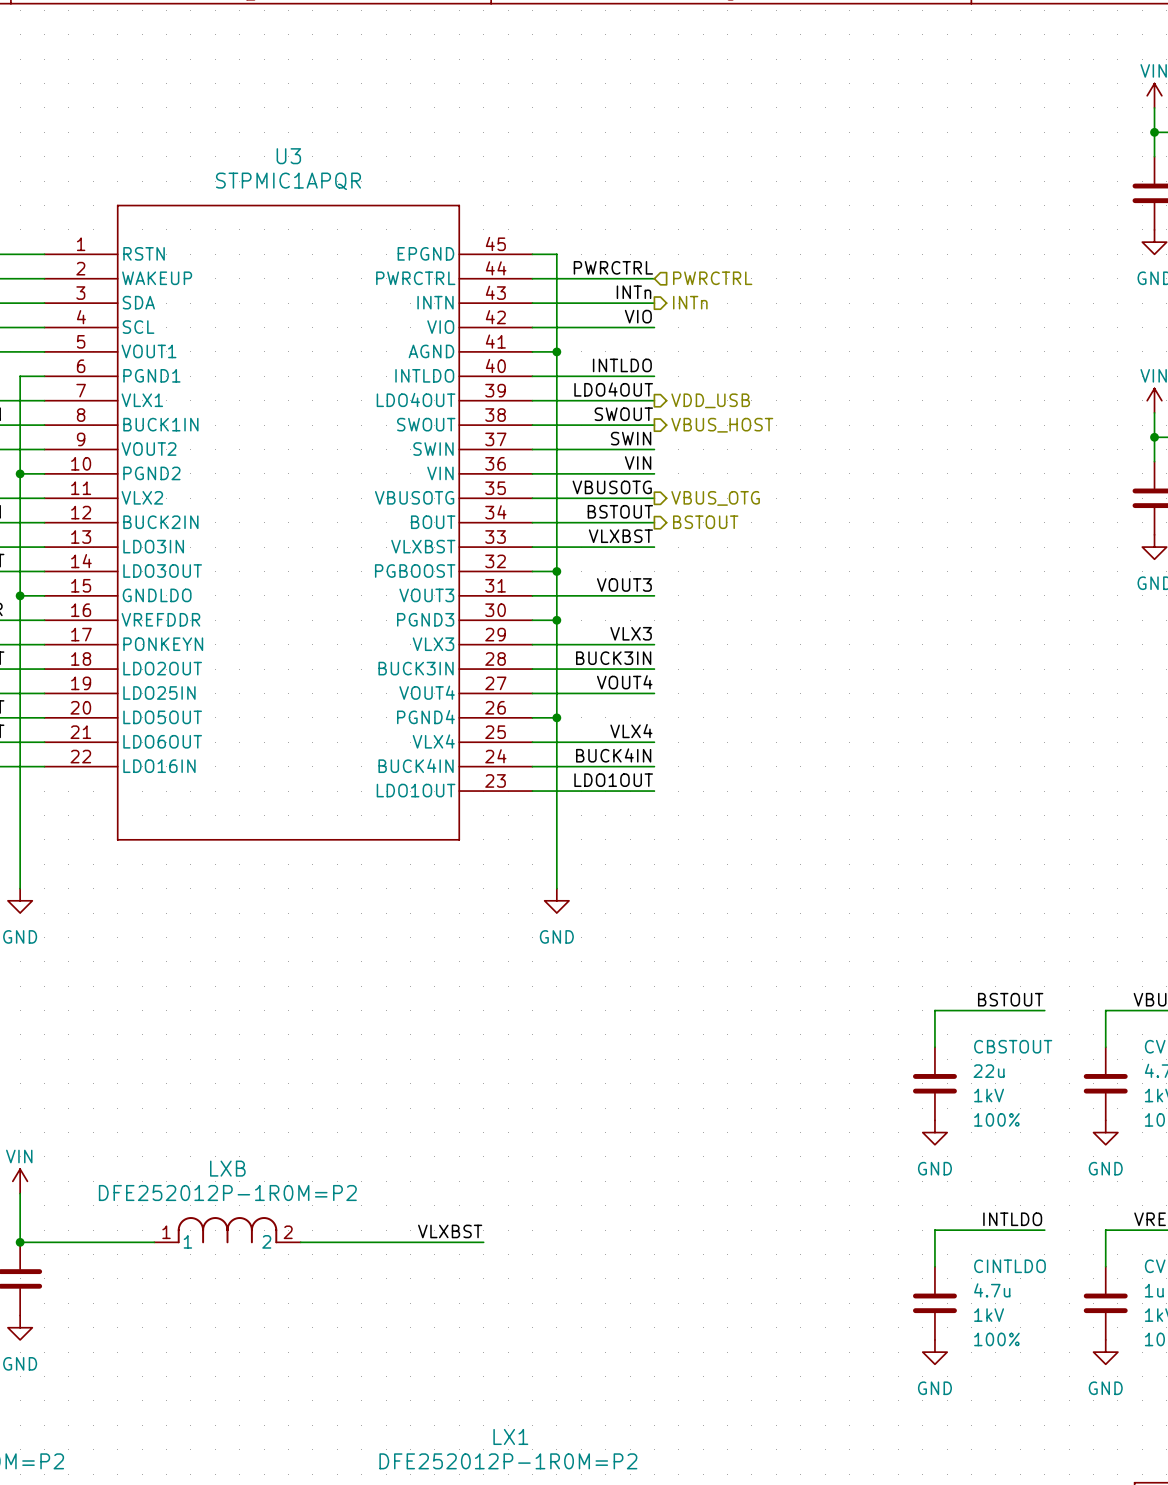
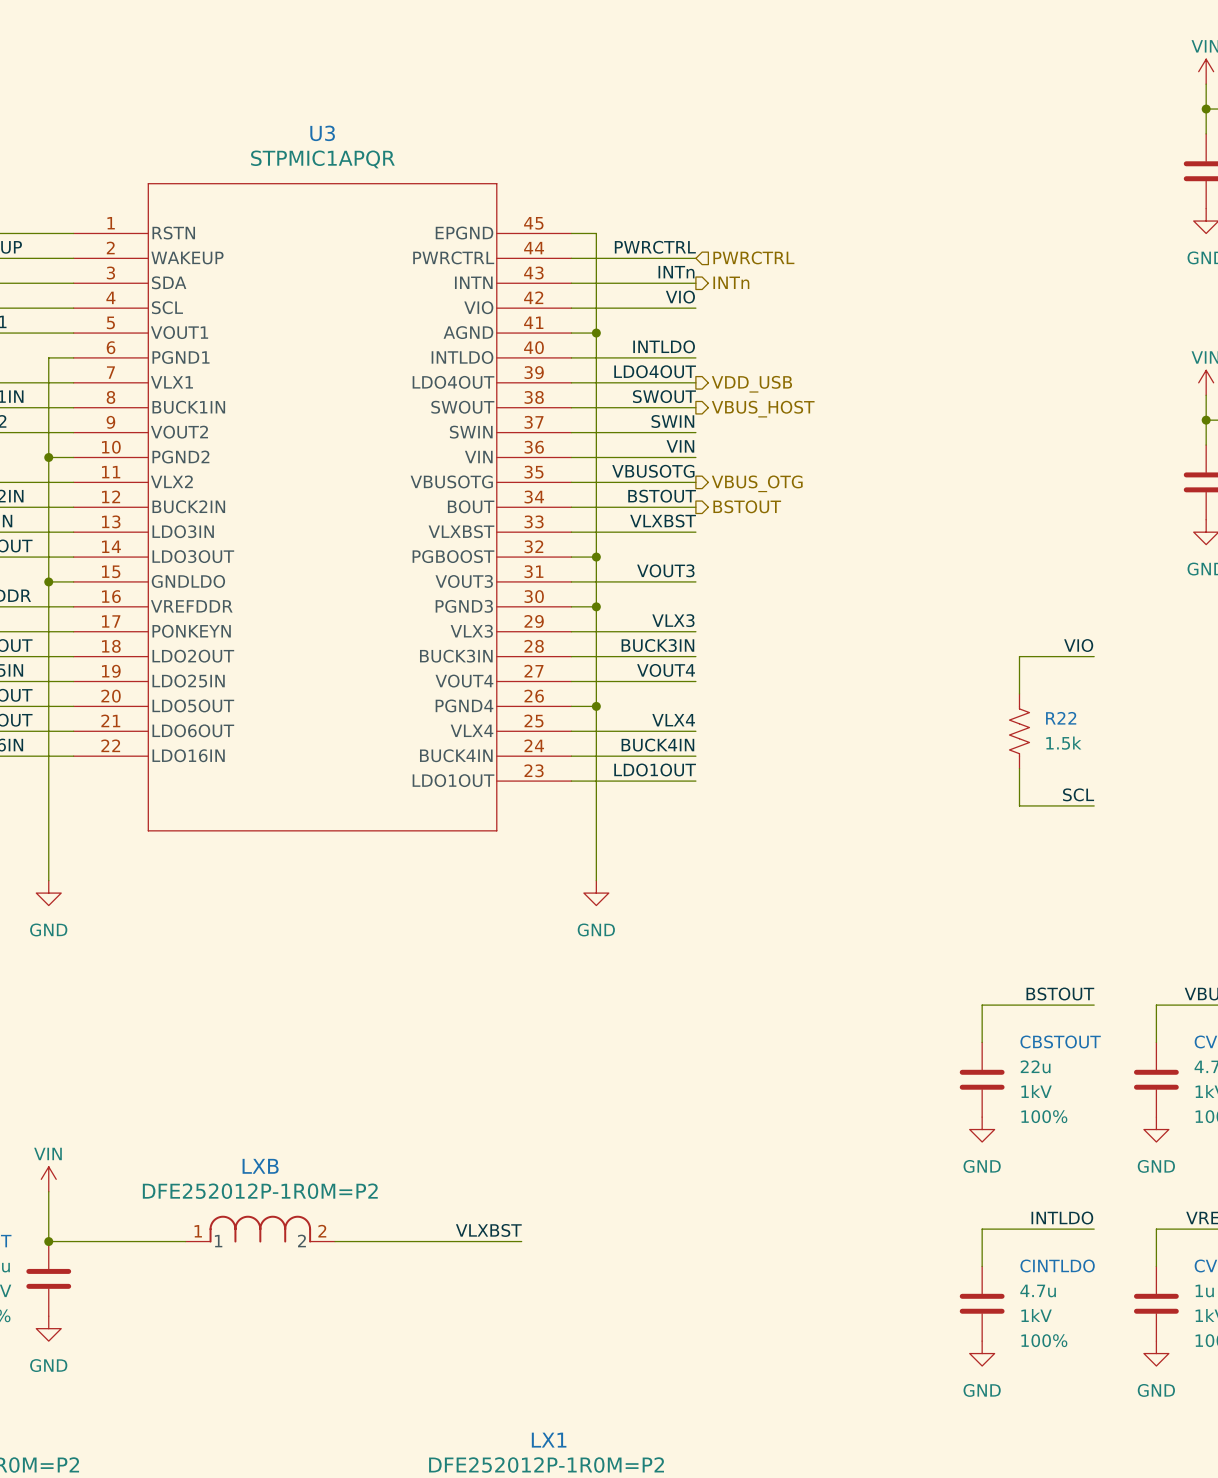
label: none -> VIO (1078, 645)
wire: none -> (1094, 656) (1019, 656) (1019, 693)
R22: none -> 1.5k (1019, 731)
wire: none -> (1019, 768) (1019, 805) (1094, 805)
label: none -> SCL (1078, 794)

